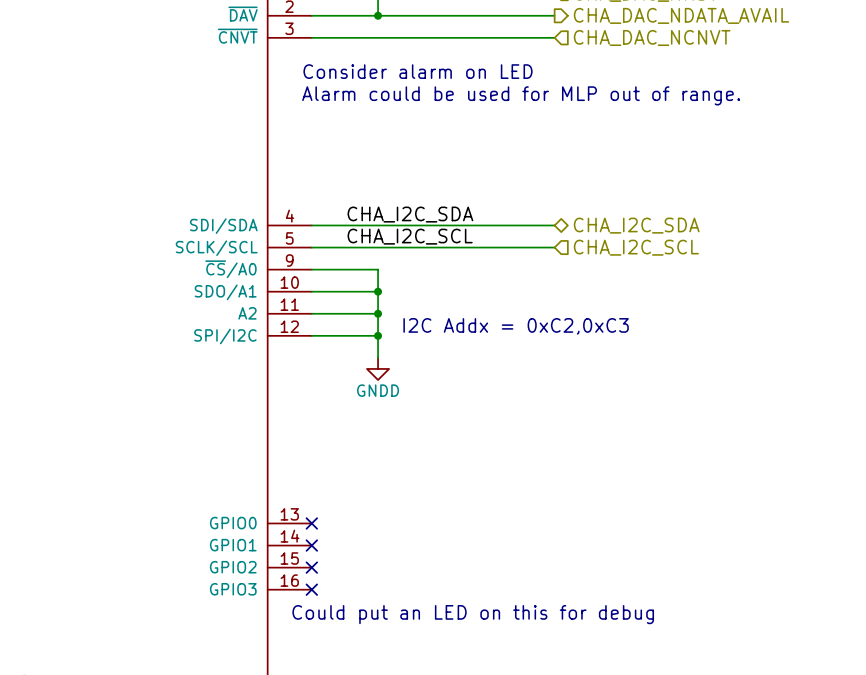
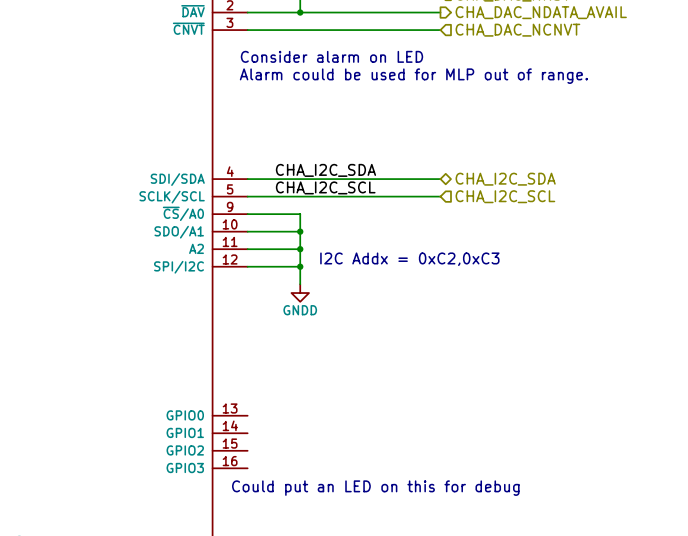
no-connect mark: (311, 523) -> none
no-connect mark: (311, 545) -> none
no-connect mark: (311, 567) -> none
no-connect mark: (311, 589) -> none

